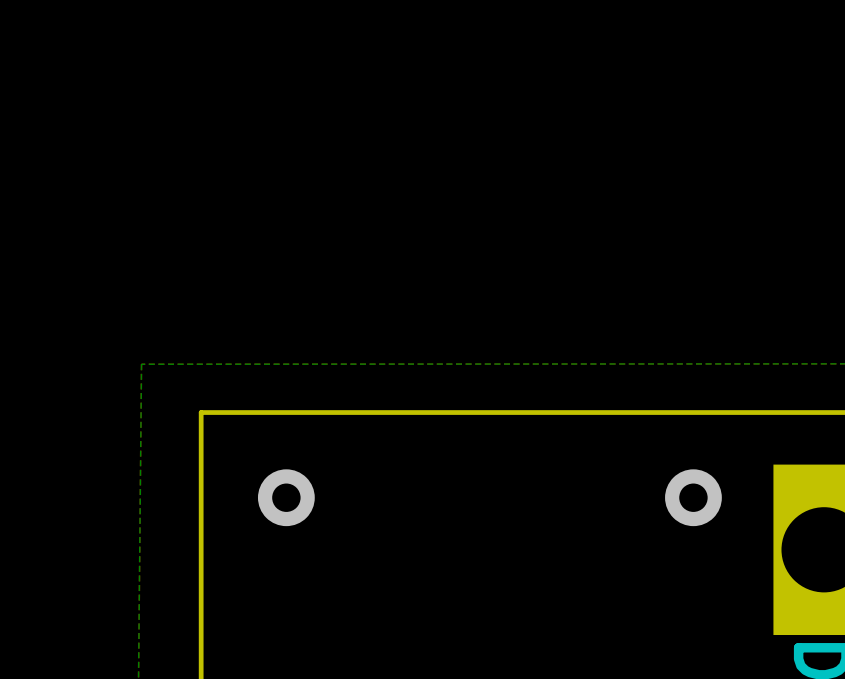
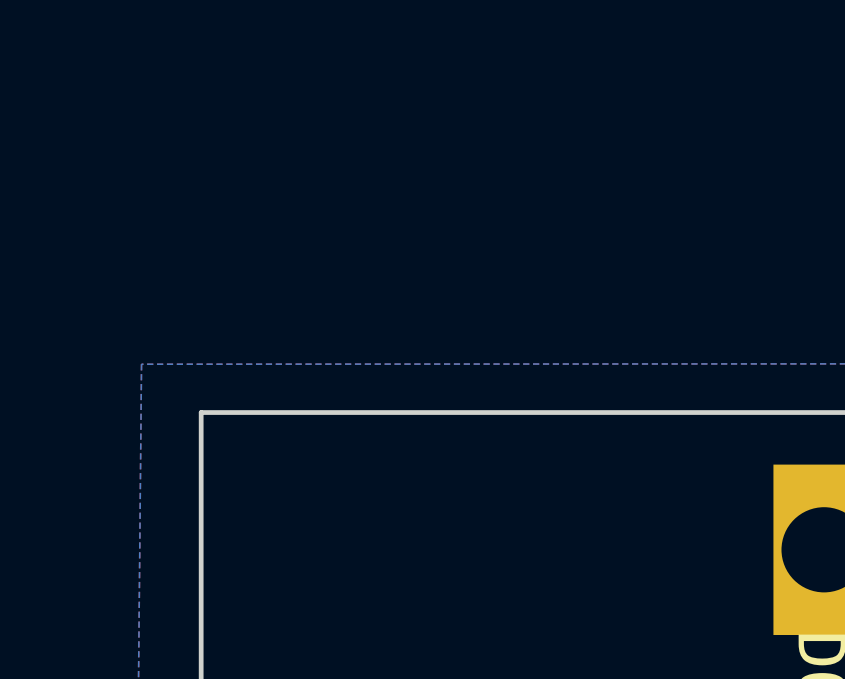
via: (286, 497) -> none
via: (693, 497) -> none

